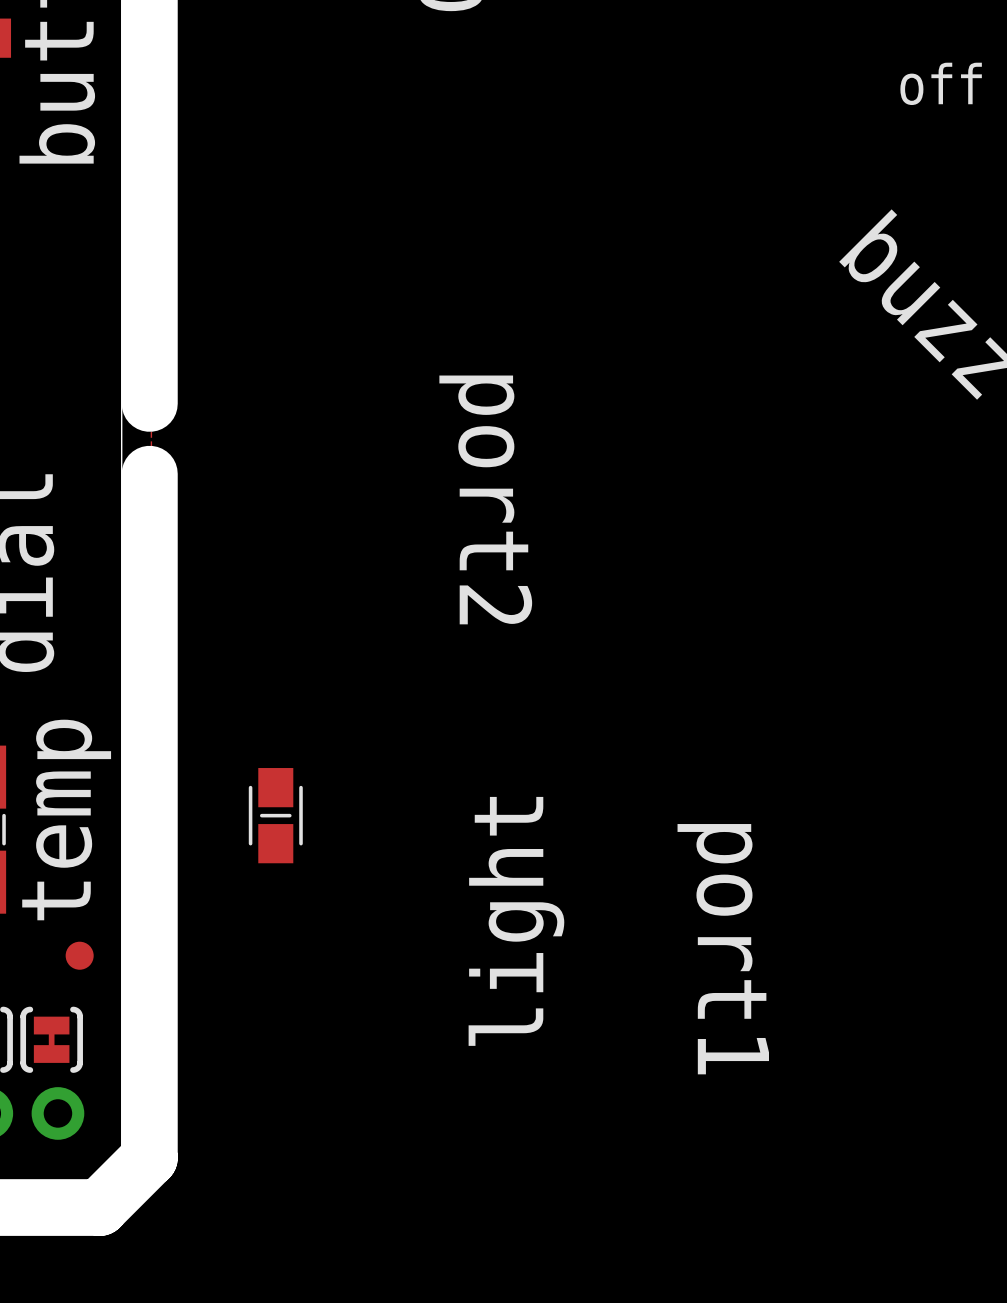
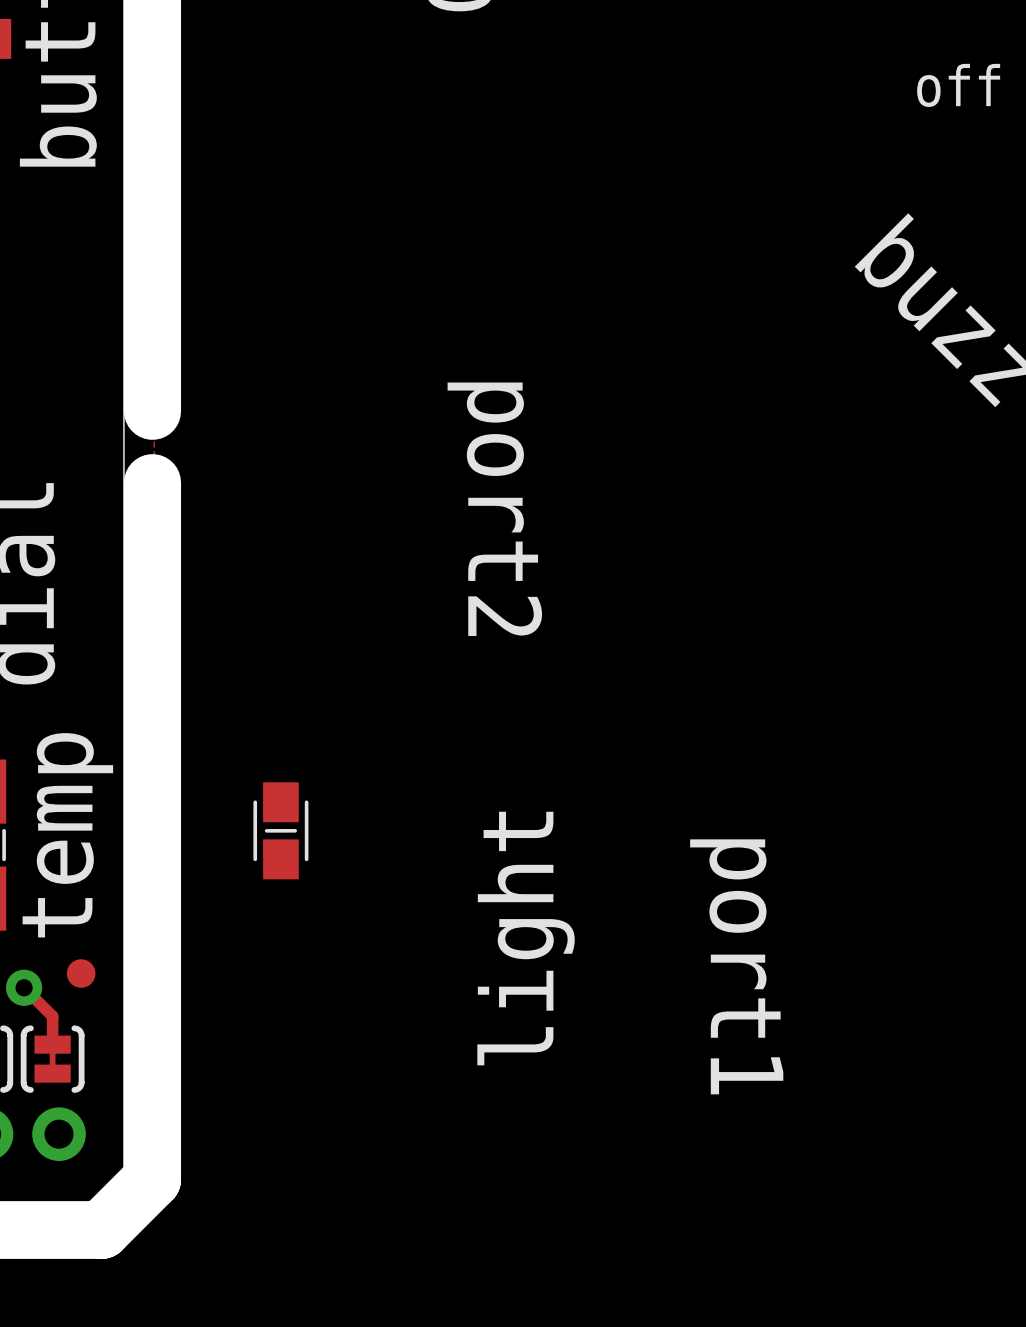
track: none -> (24, 987) (52, 1016) (52, 1044)
via: none -> (24, 987)

